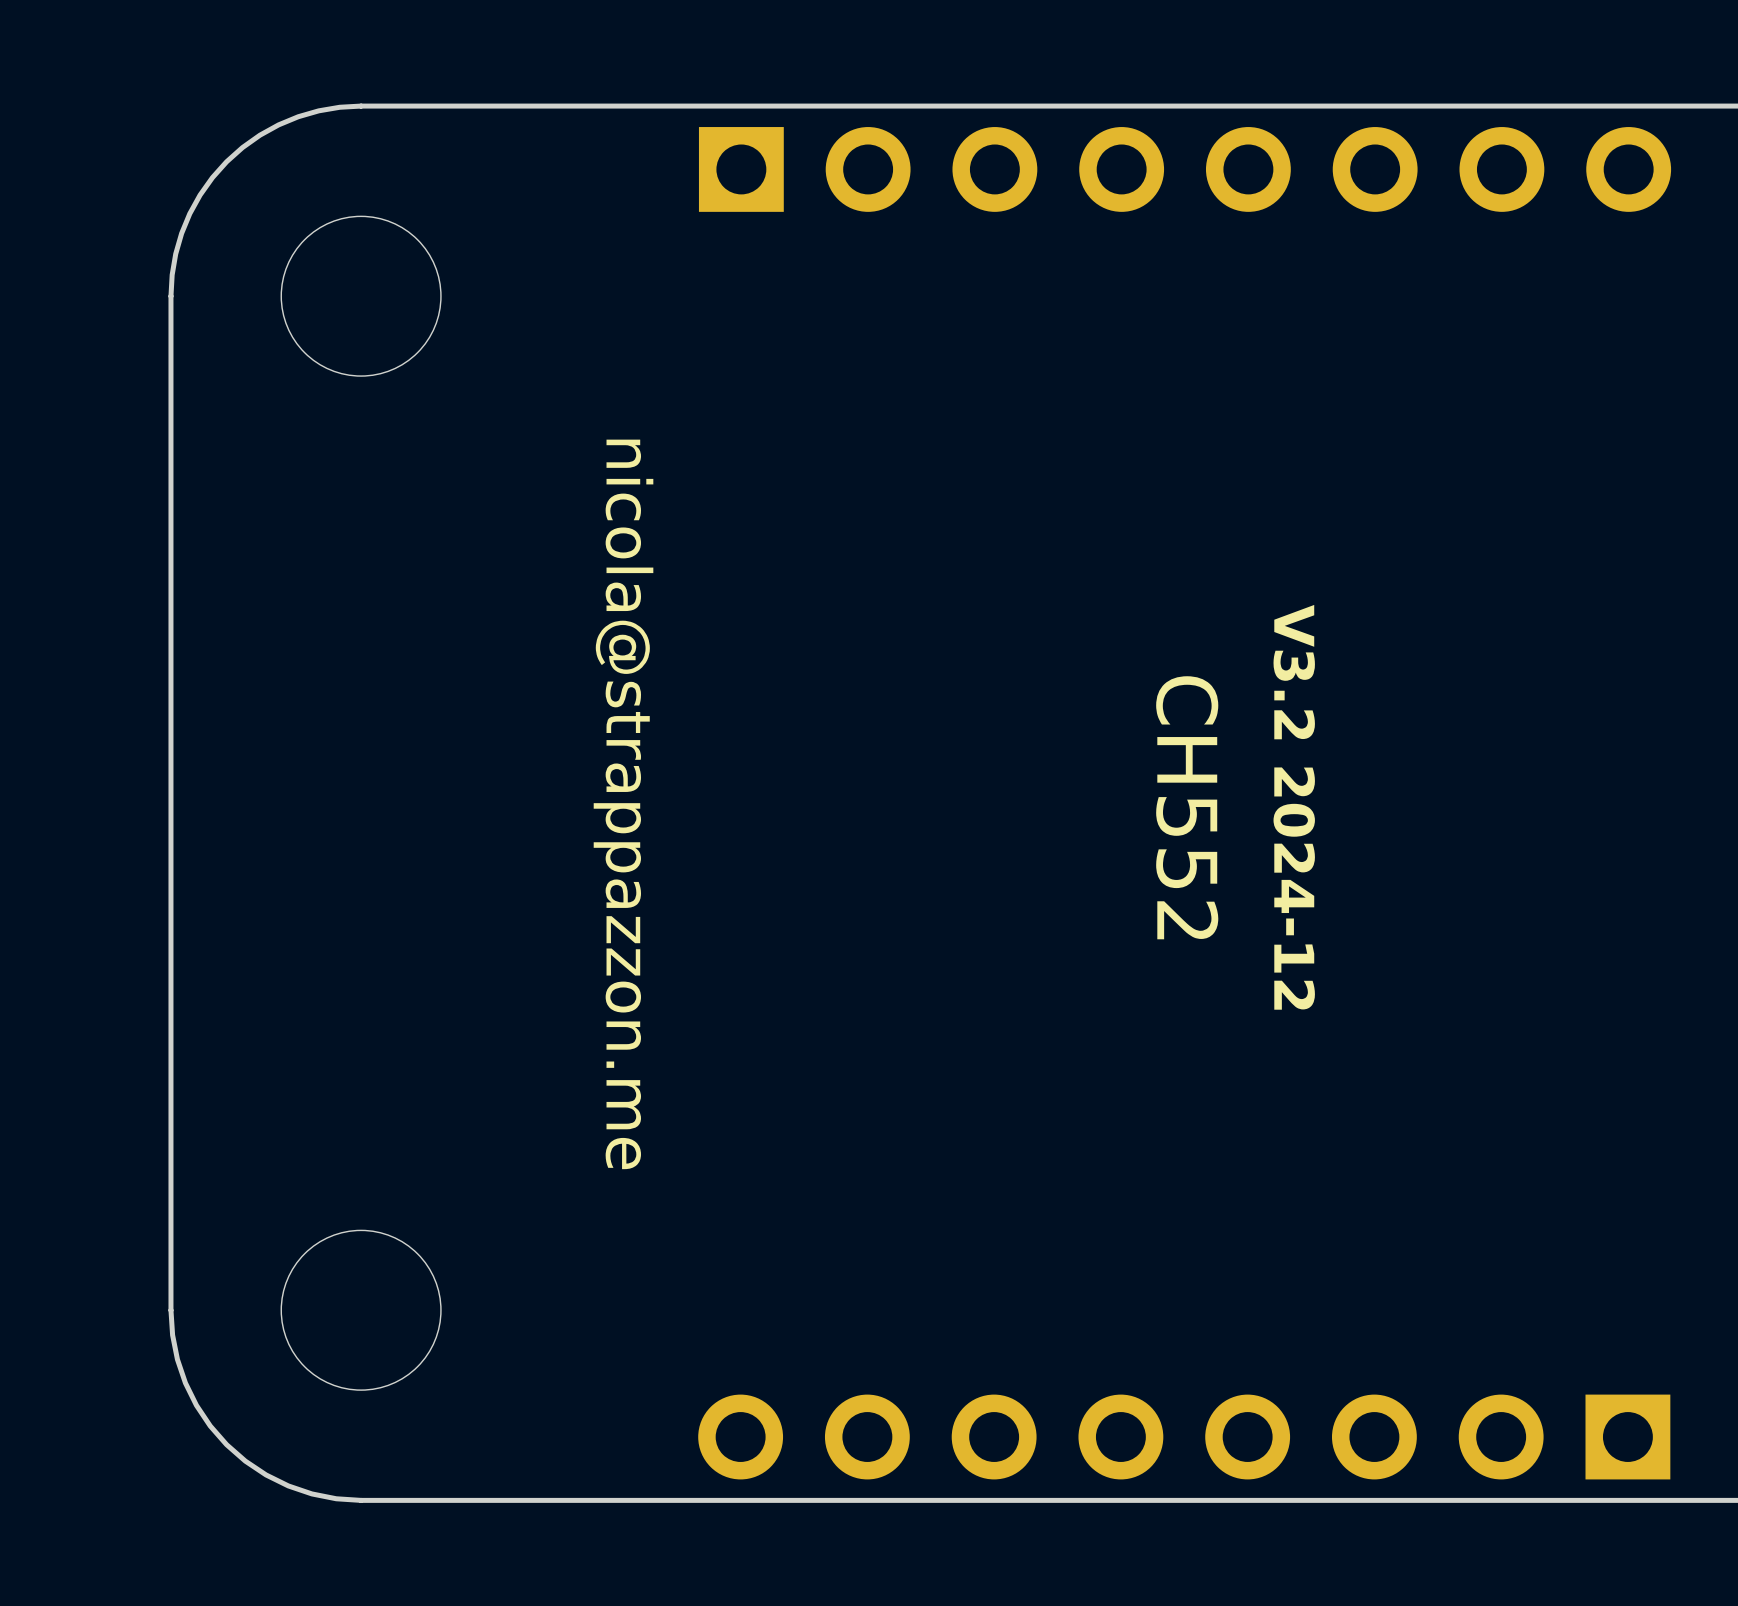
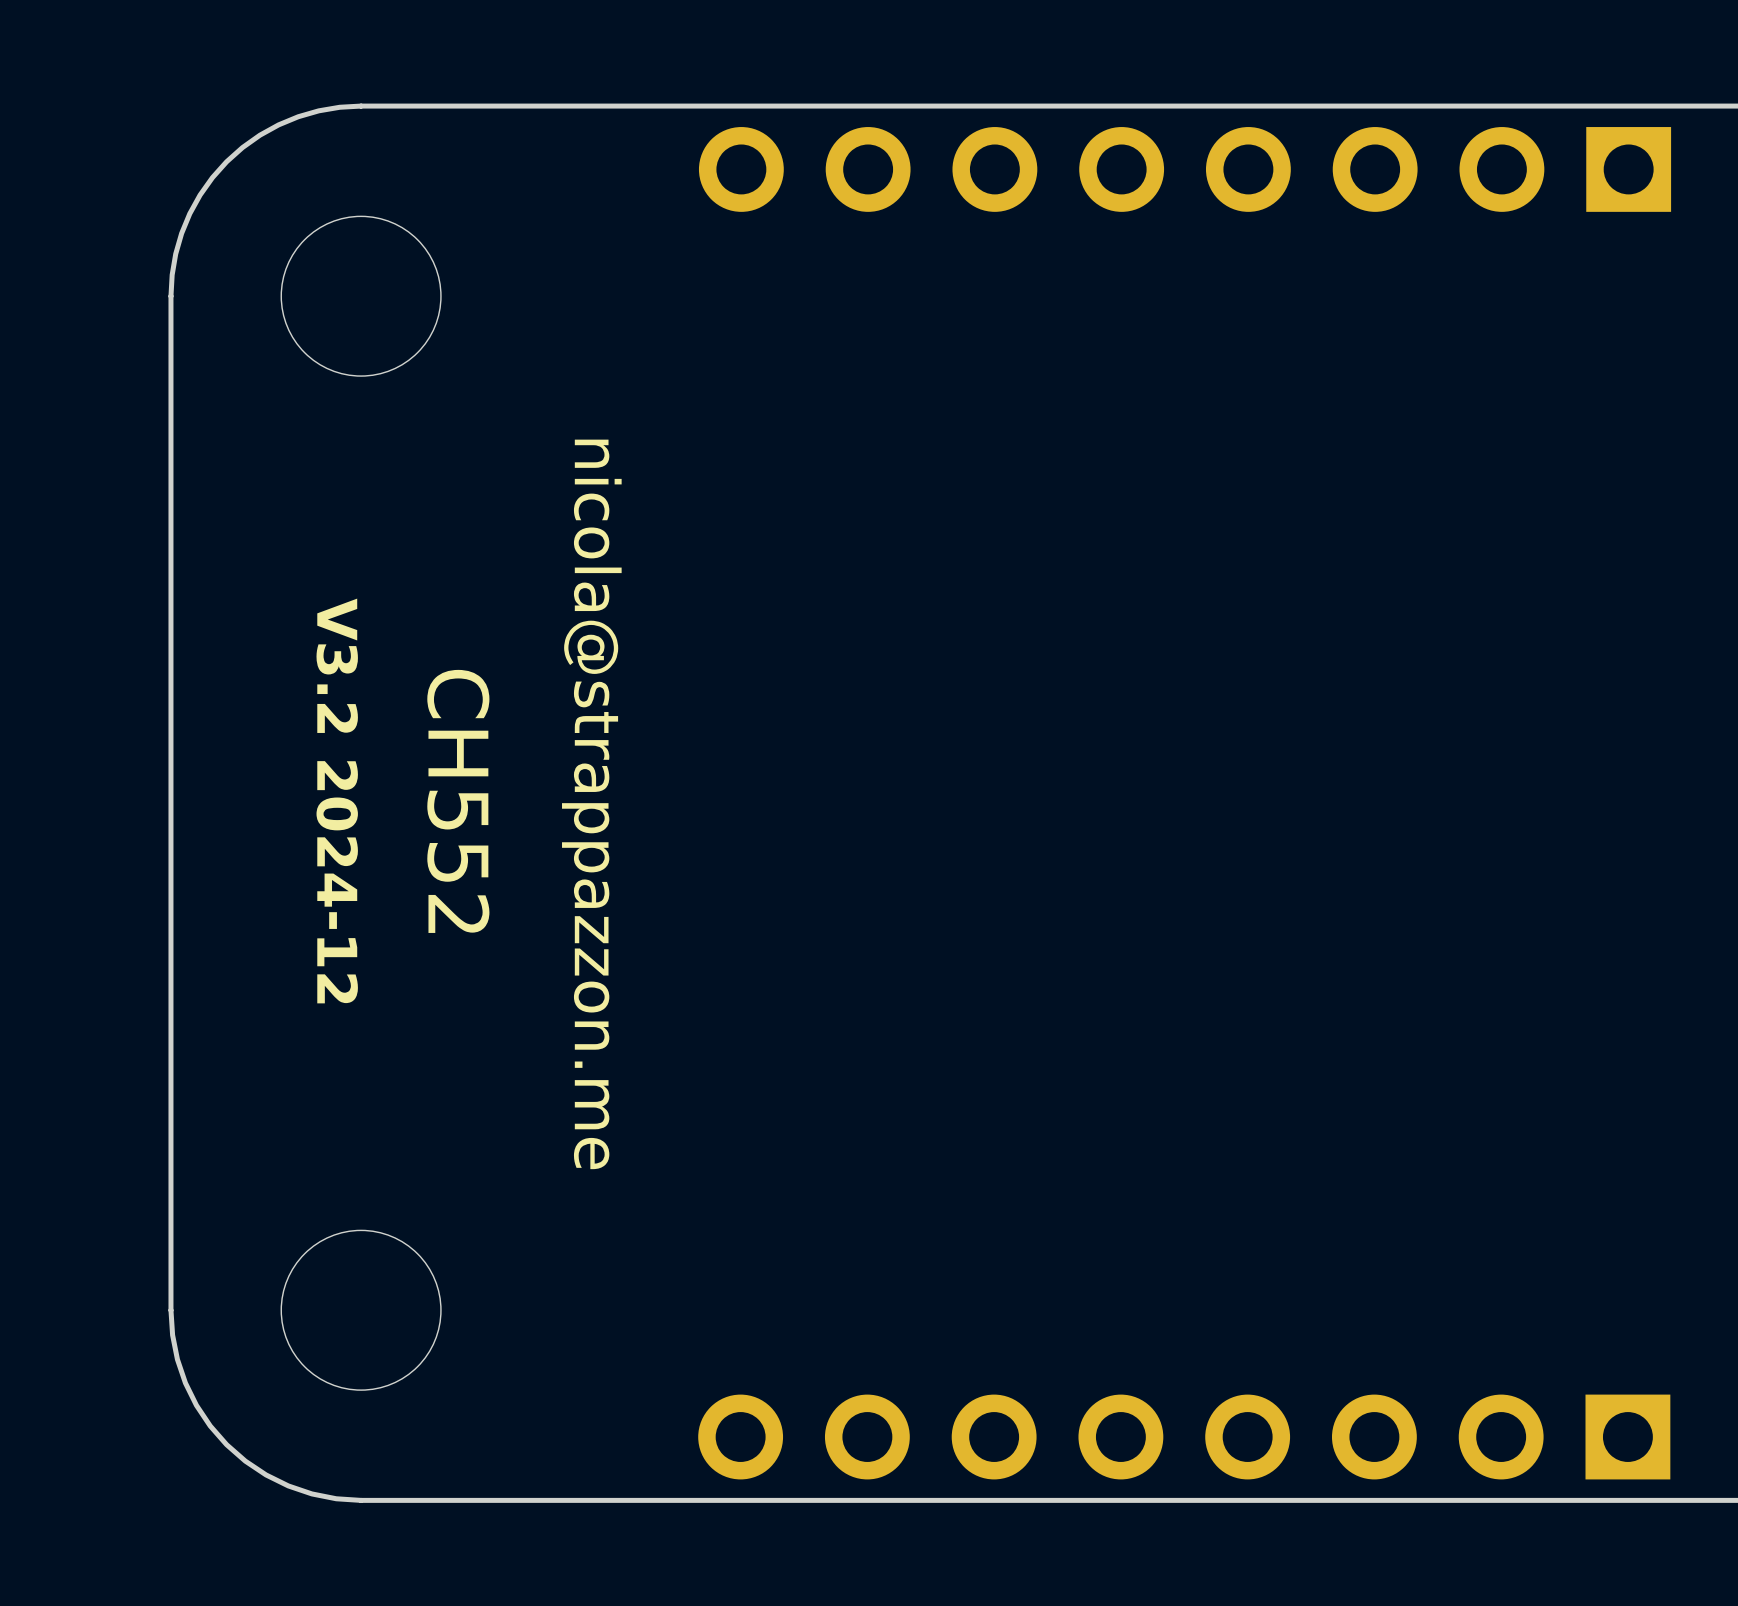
part rotation: 0° (1185, 169) -> 180° (1185, 169)
text position: nicola@strappazzon.me (623, 804) -> nicola@strappazzon.me (591, 804)
text position: CH552 (1187, 807) -> CH552 (458, 801)
text position: V3.2 2024-12 (1294, 807) -> V3.2 2024-12 (337, 800)

